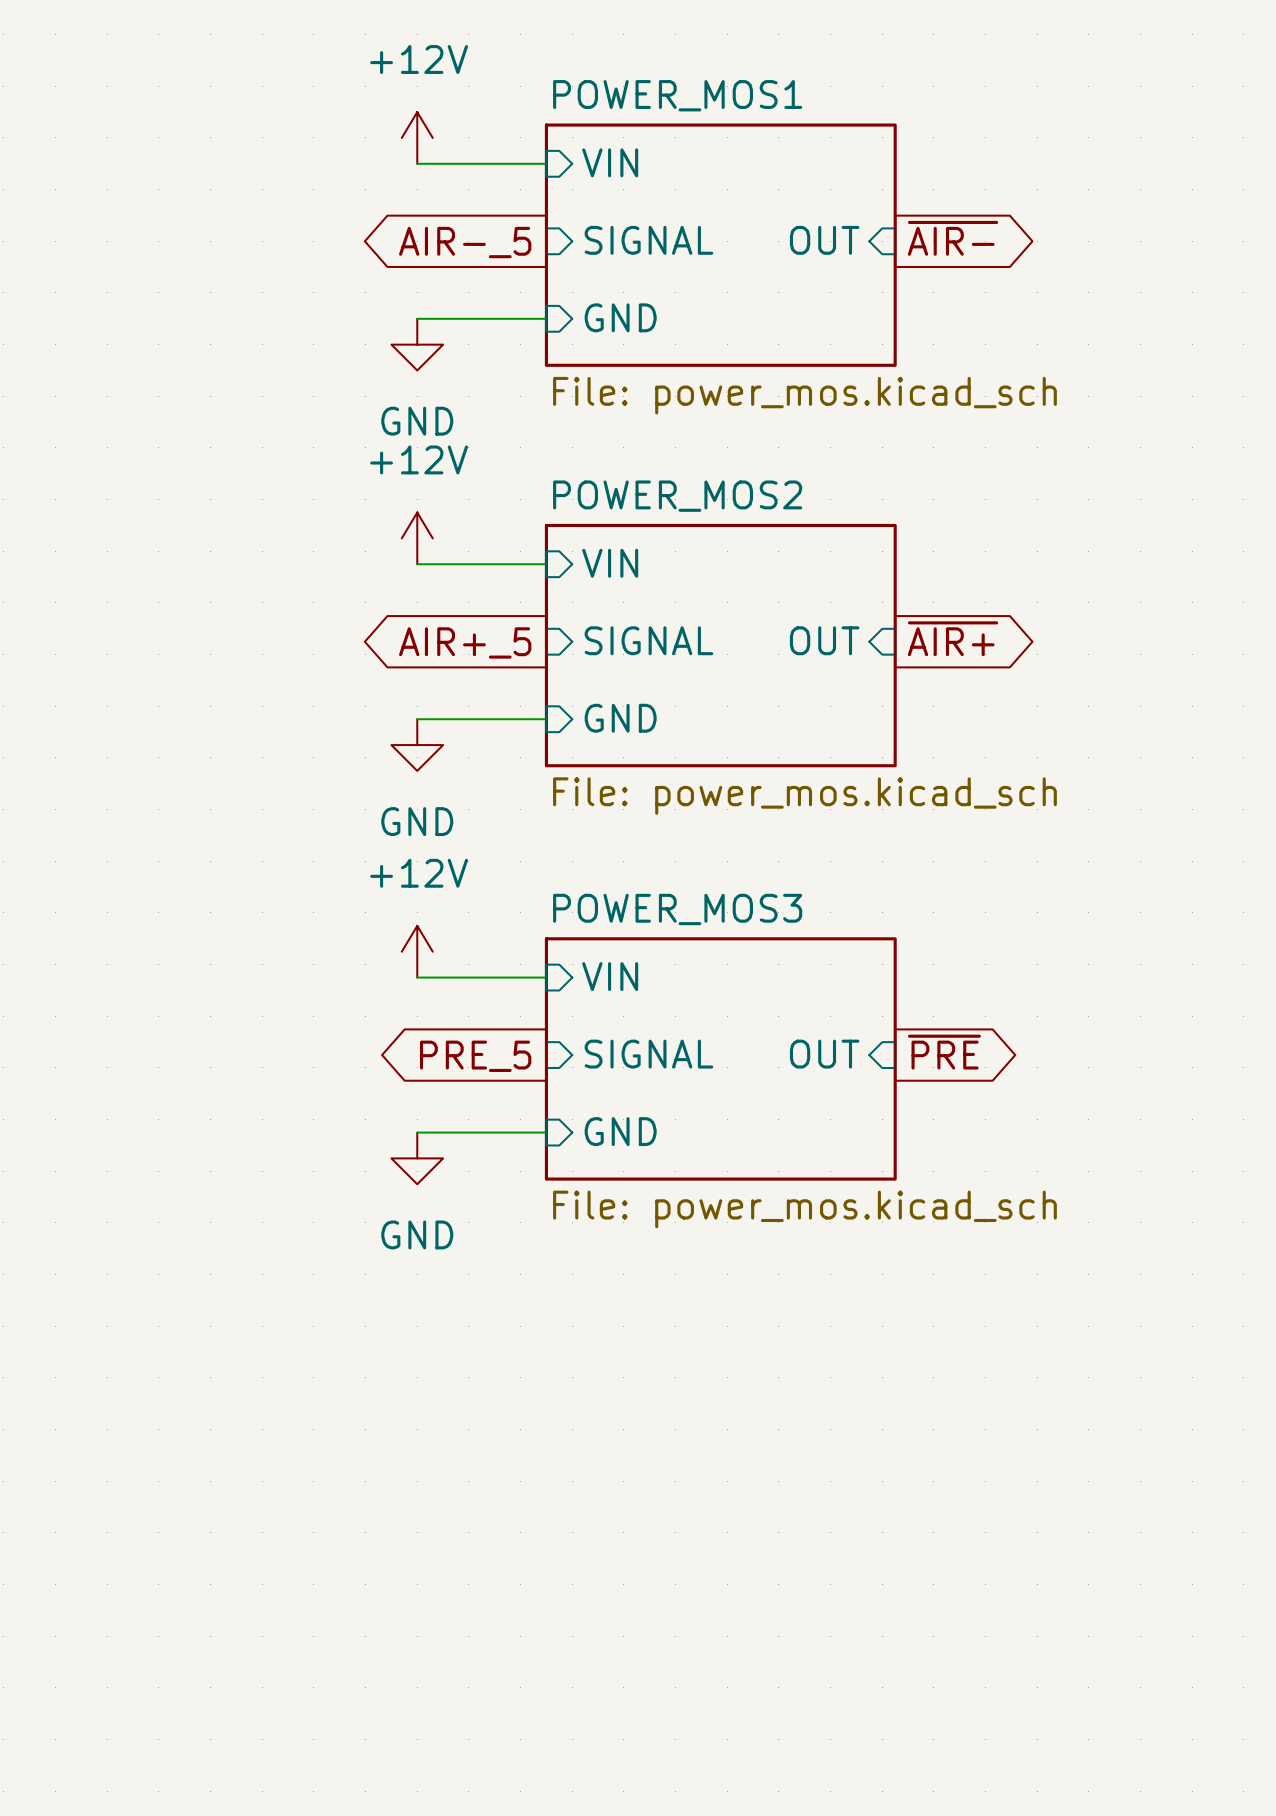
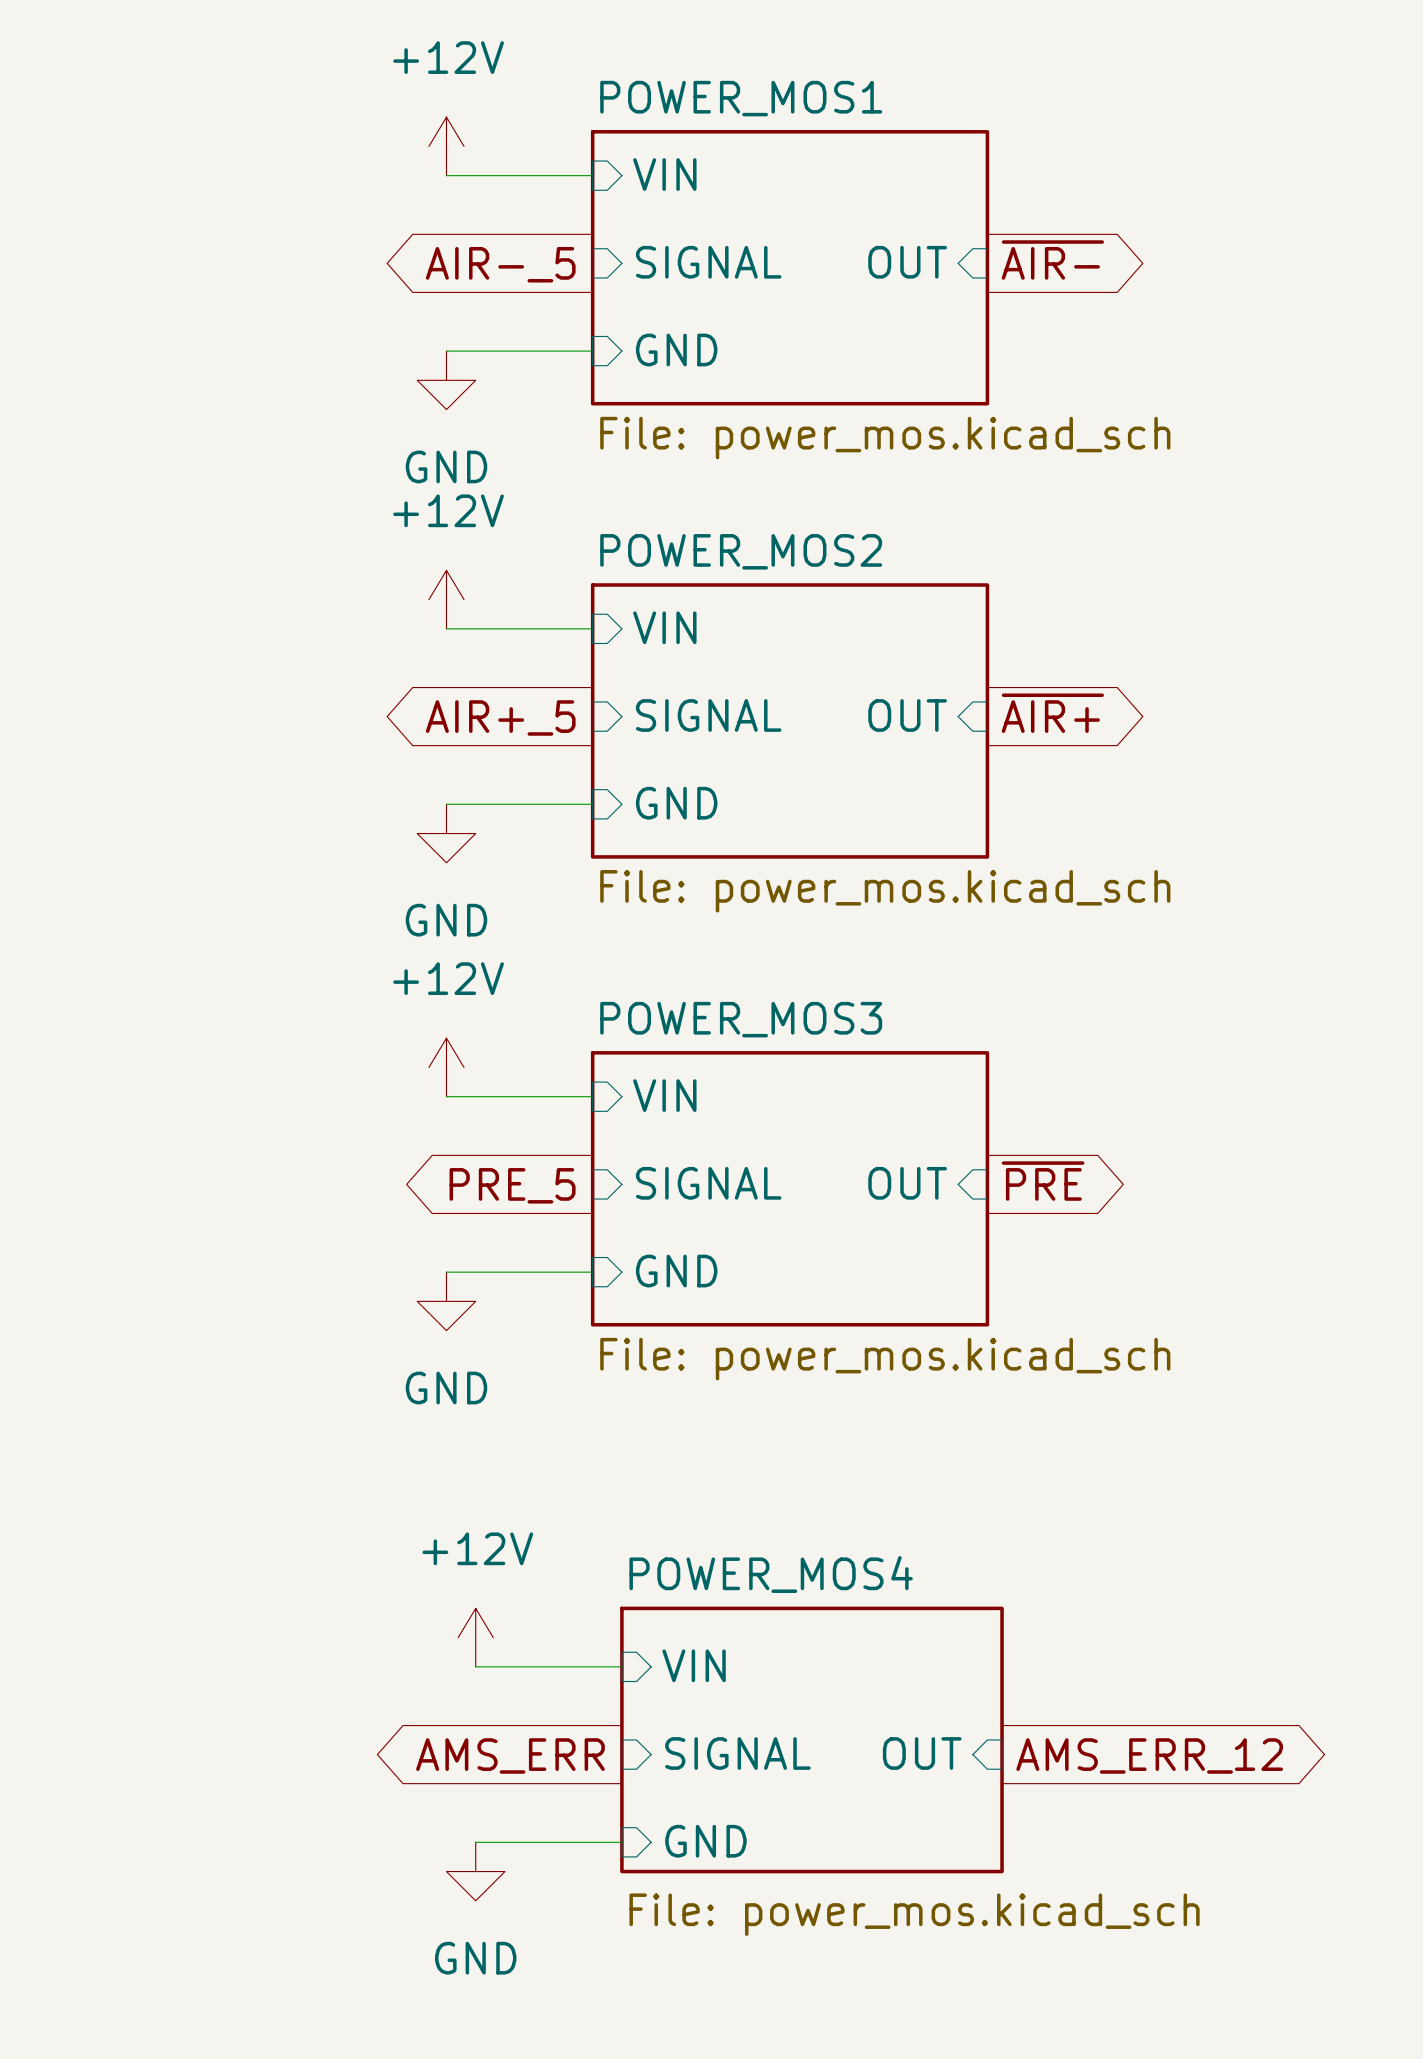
power symbol: none -> +12V (475, 1637)
sheet pin: none -> VIN (694, 1665)
wire: none -> (475, 1666) (621, 1666)
sheet POWER_MOS4: none -> File: power_mos.kicad_sch (811, 1739)
sheet pin: none -> SIGNAL (737, 1753)
sheet pin: none -> OUT (922, 1753)
global label: none -> AMS_ERR (510, 1755)
global label: none -> AMS_ERR_12 (1149, 1755)
sheet pin: none -> GND (705, 1841)
wire: none -> (475, 1842) (621, 1842)
power symbol: none -> GND (475, 1871)

